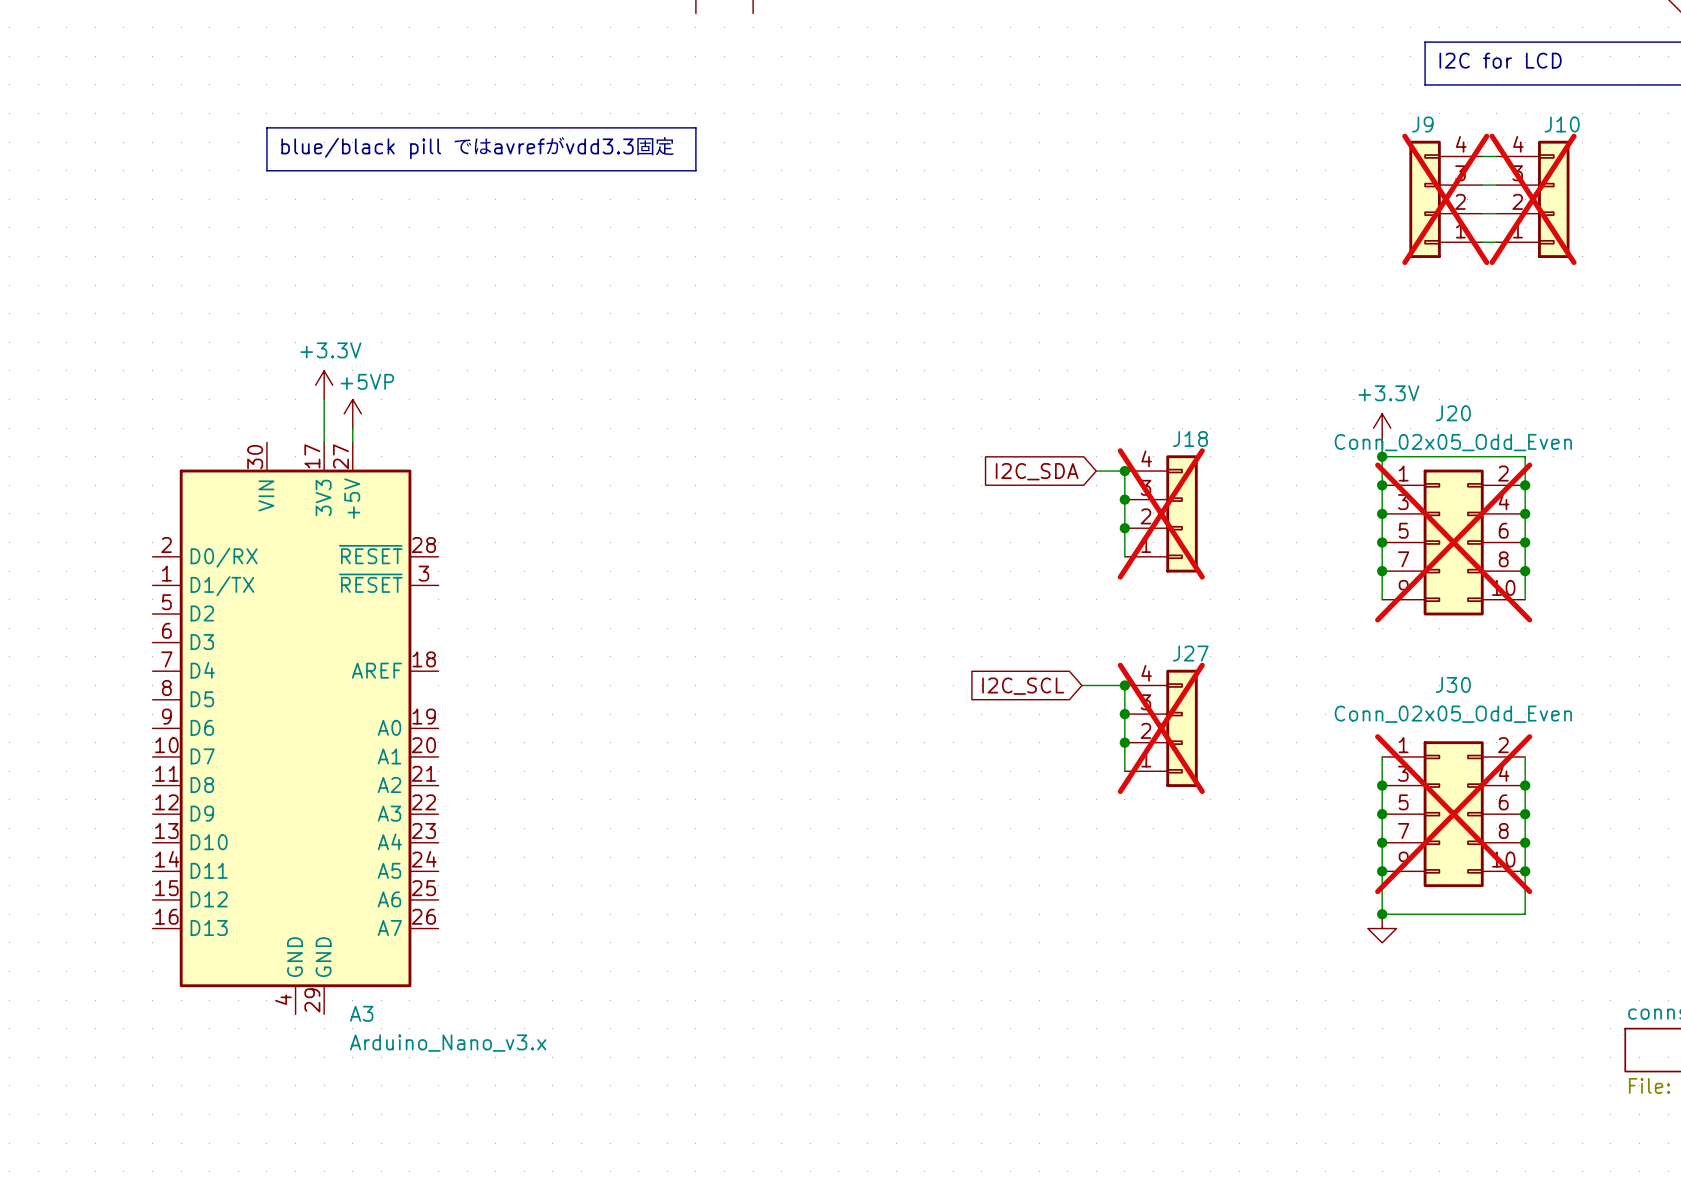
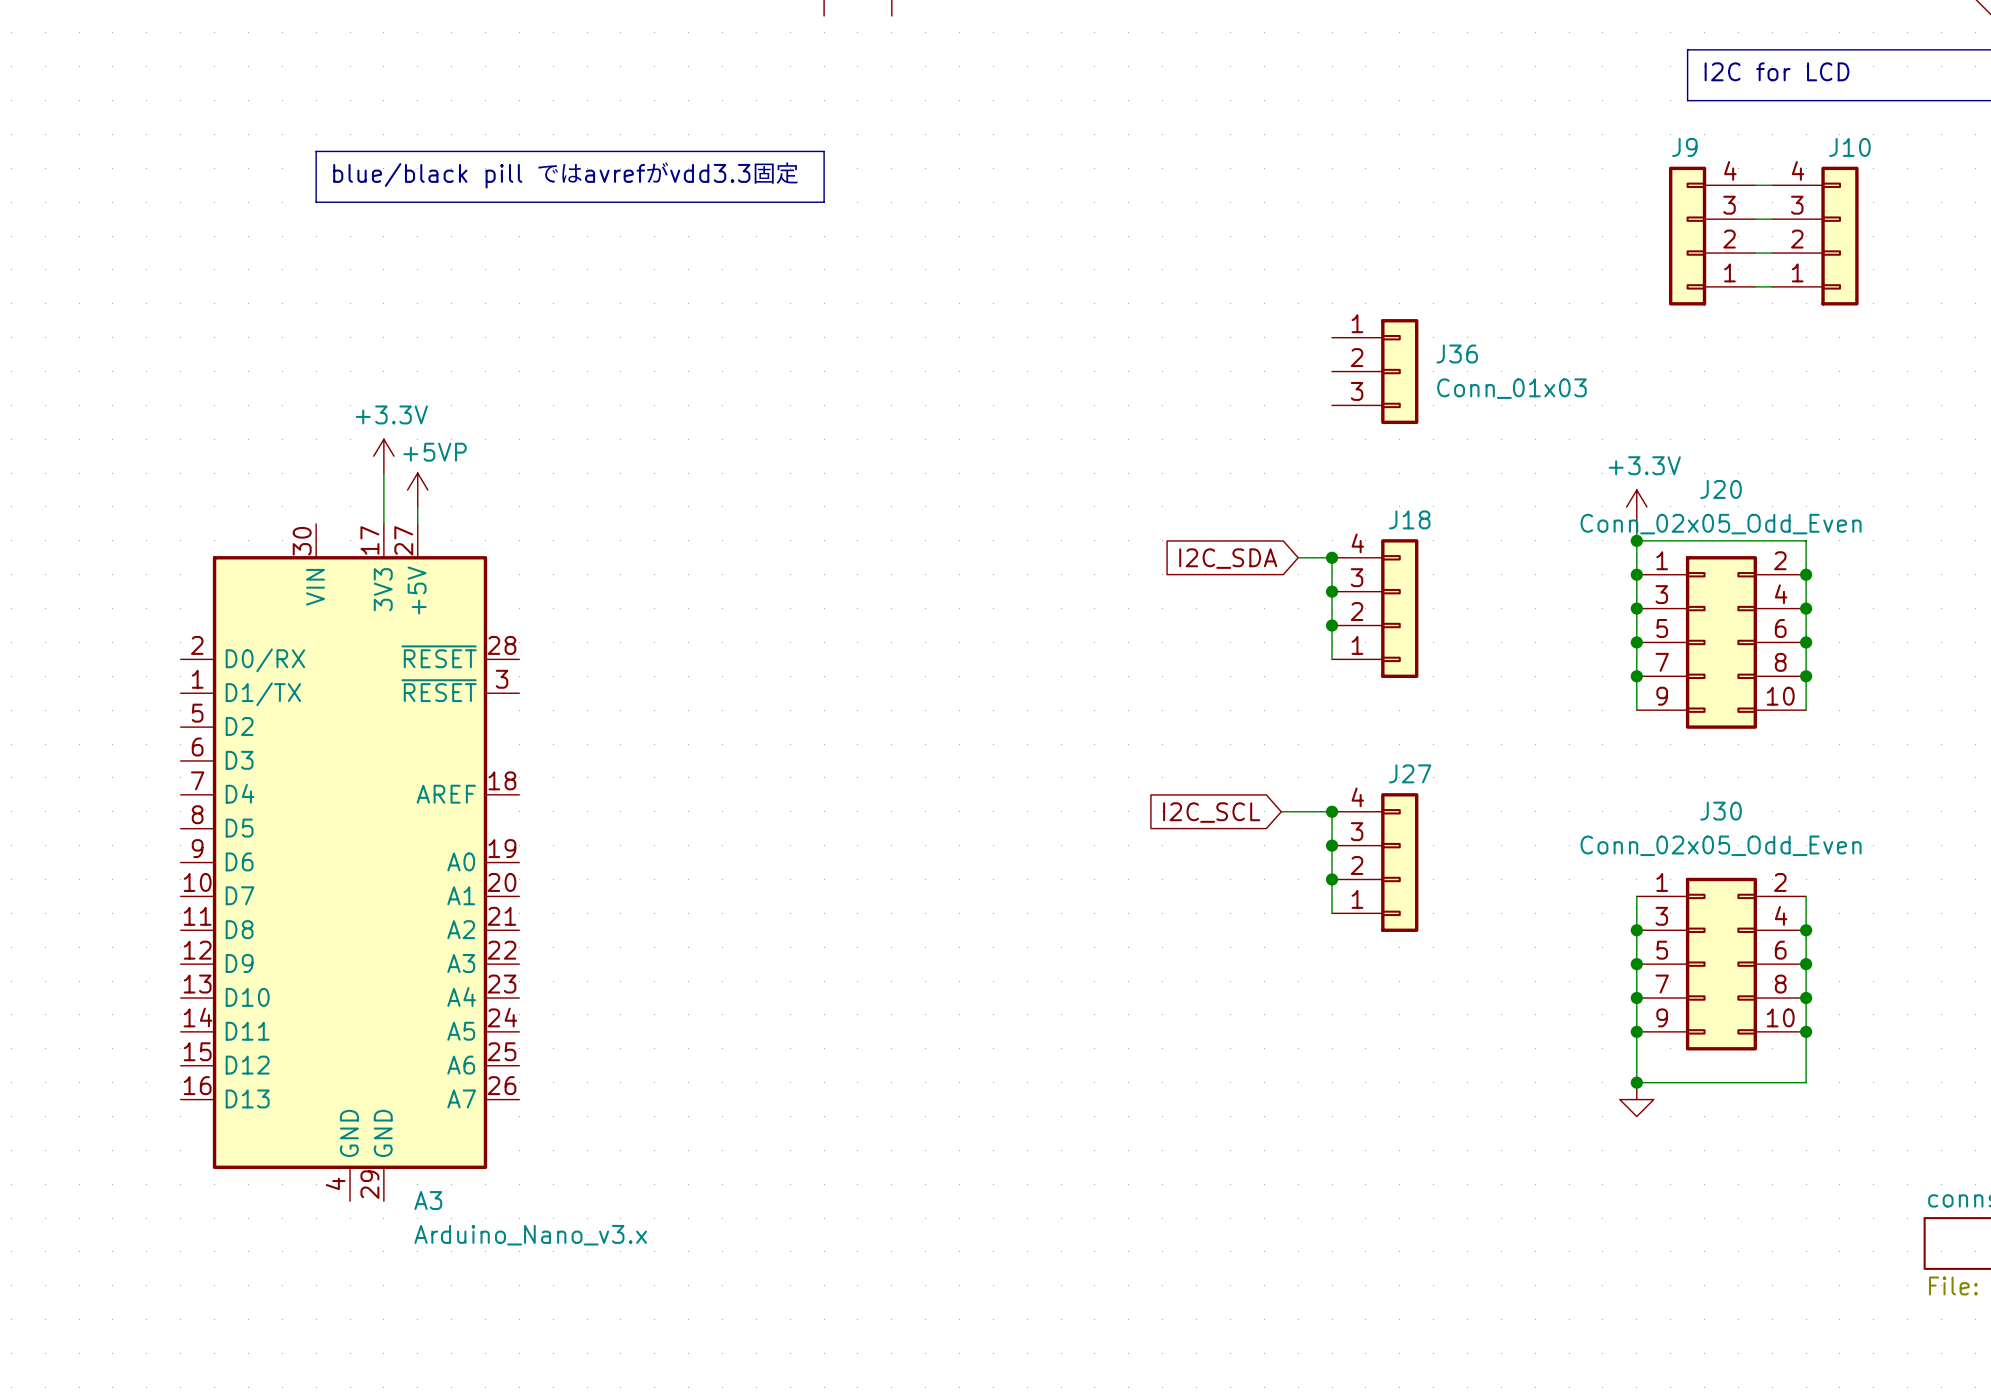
J9 do-not-place cross: (1445, 199) -> none
J10 do-not-place cross: (1533, 199) -> none
J36: none -> Conn_01x03 (1375, 371)
J18 do-not-place cross: (1161, 513) -> none
J20 do-not-place cross: (1453, 542) -> none
J27 do-not-place cross: (1161, 728) -> none
J30 do-not-place cross: (1453, 814) -> none

